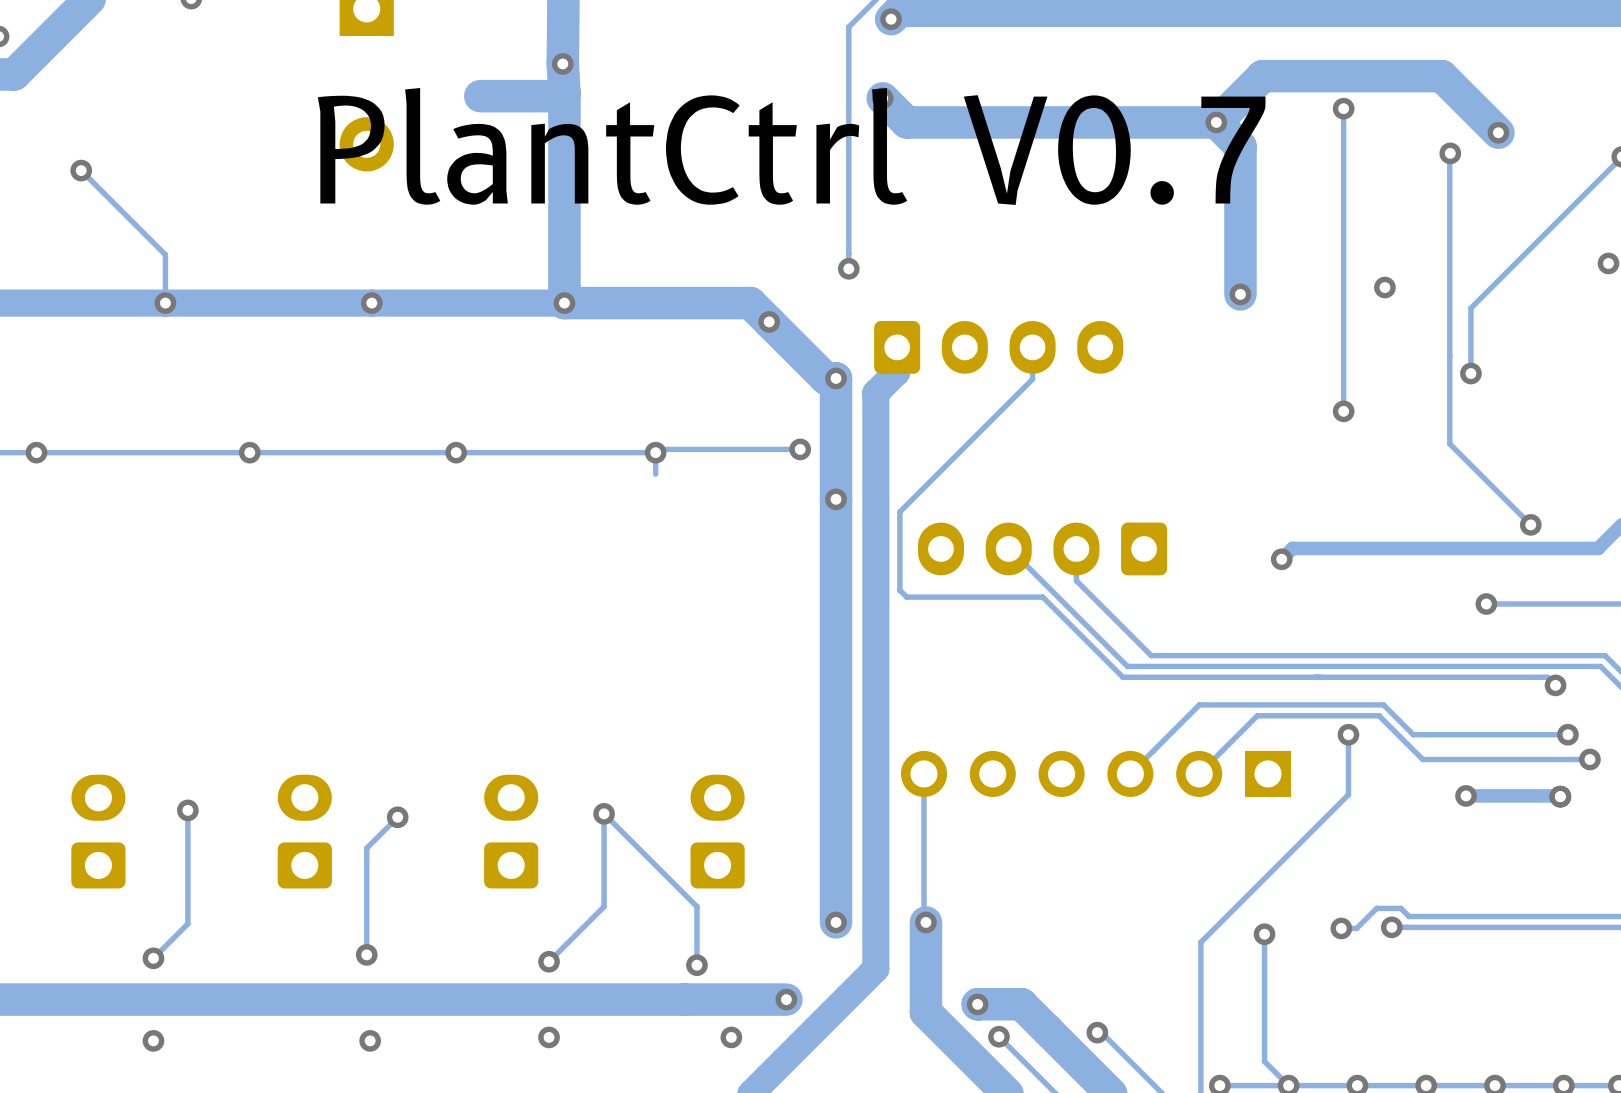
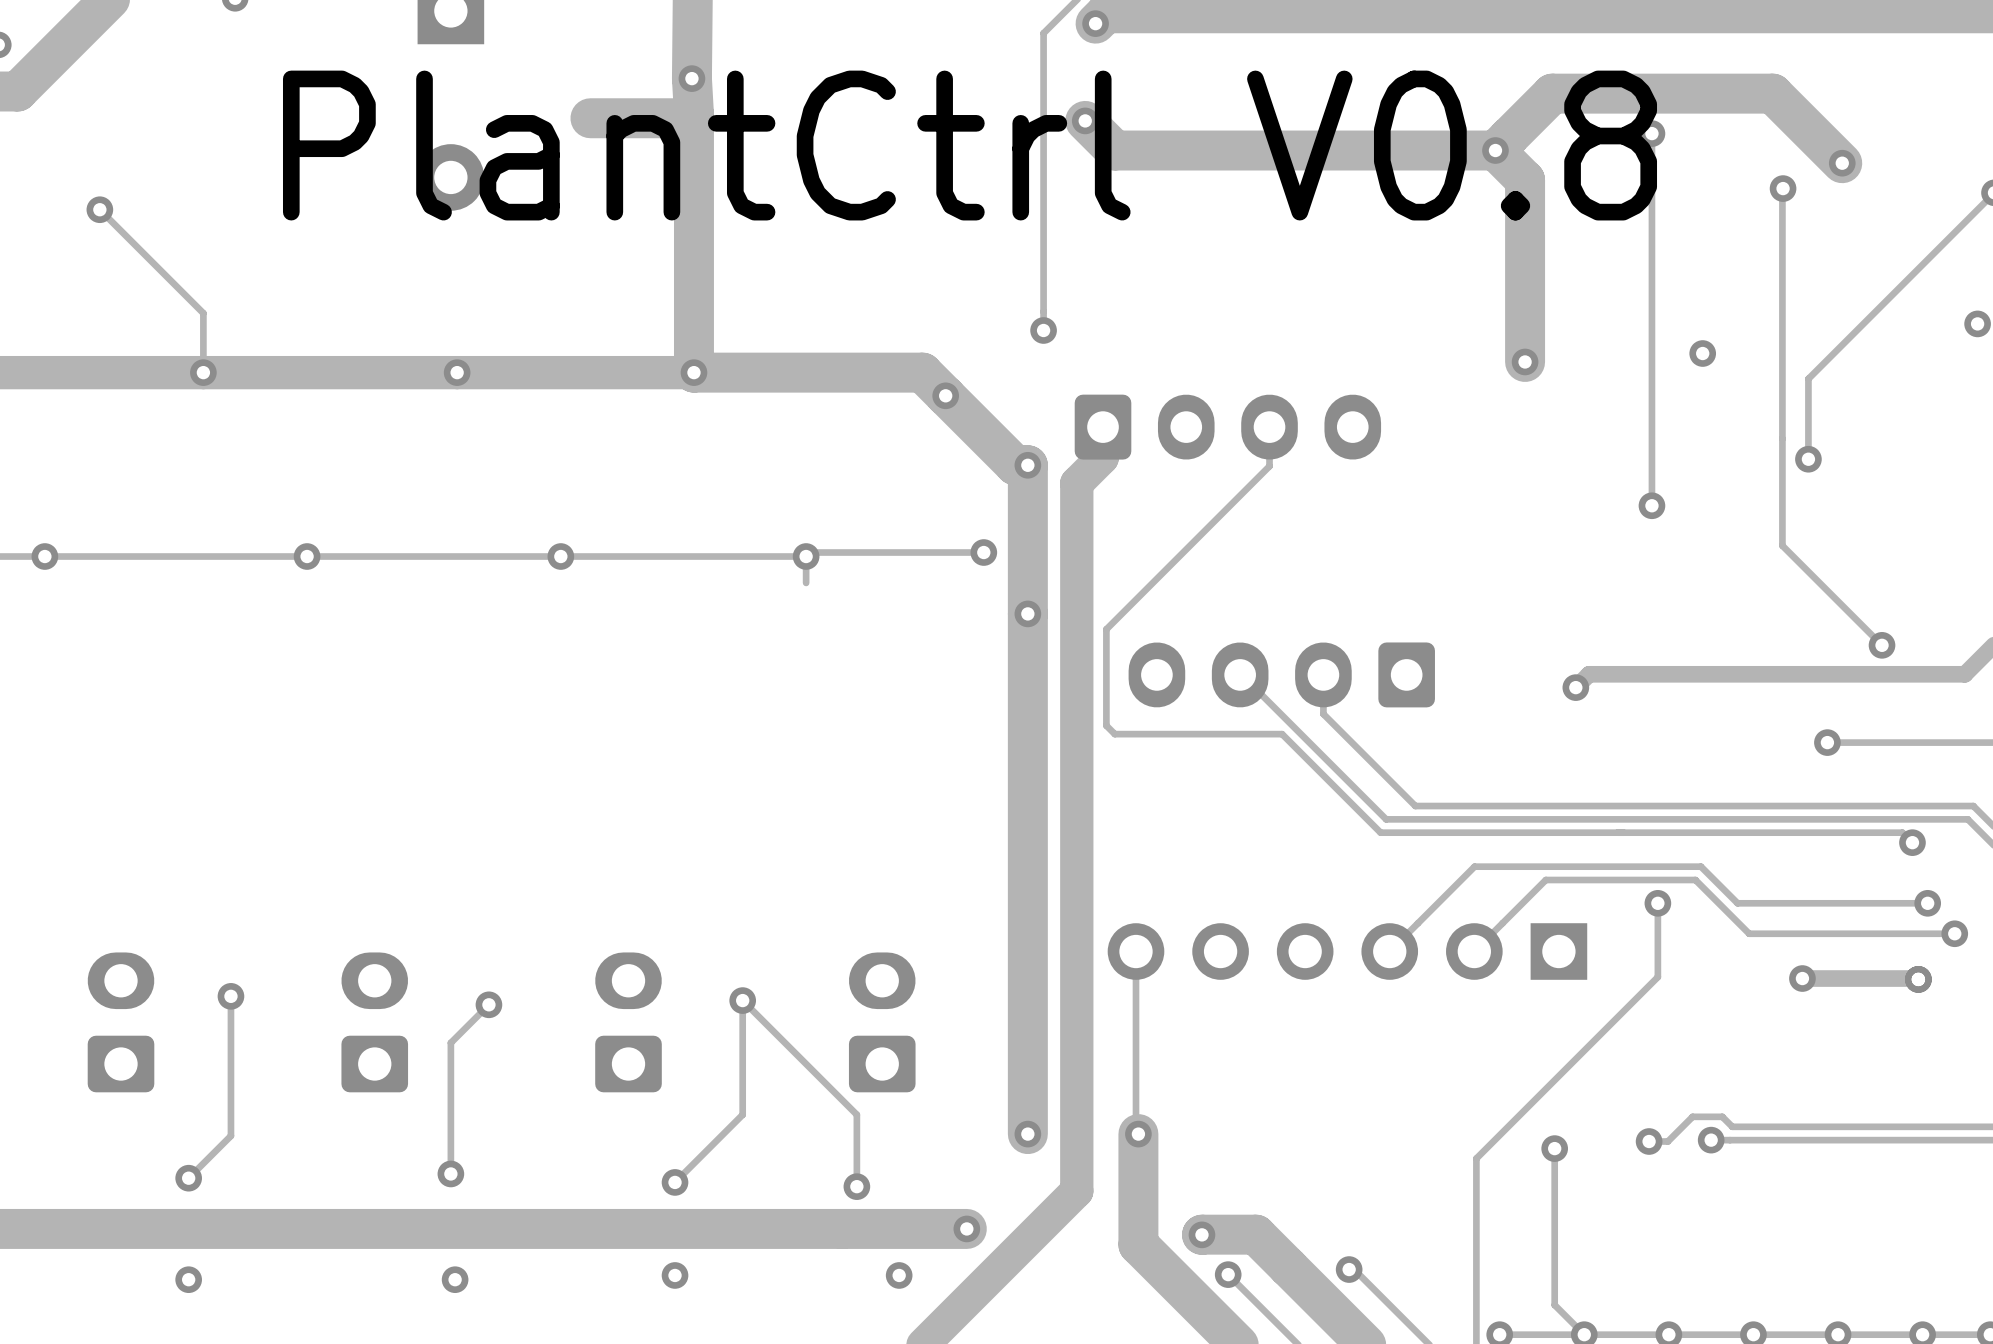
text: PlantCtrl V0.7 (791, 146) -> PlantCtrl V0.8 (970, 145)

